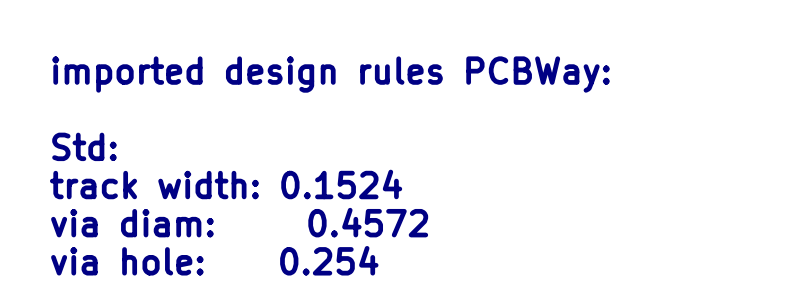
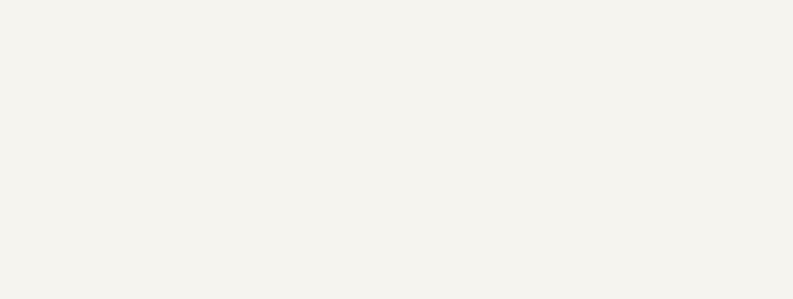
text: imported design rules PCBWay: (331, 74) -> none
text: Std: (84, 146) -> none
text: track width: 0.1524 (226, 184) -> none
text: via diam: 0.4572 (239, 222) -> none
text: via hole: 0.254 (214, 260) -> none

